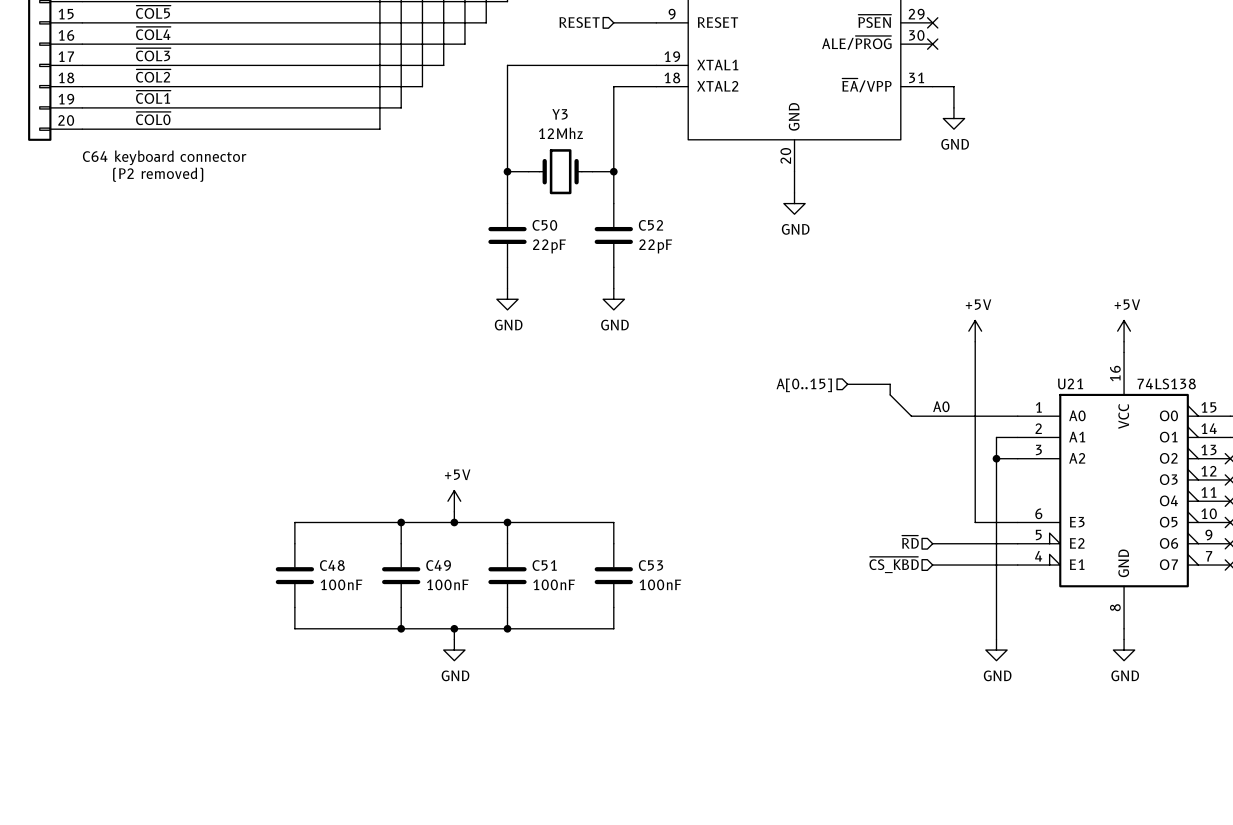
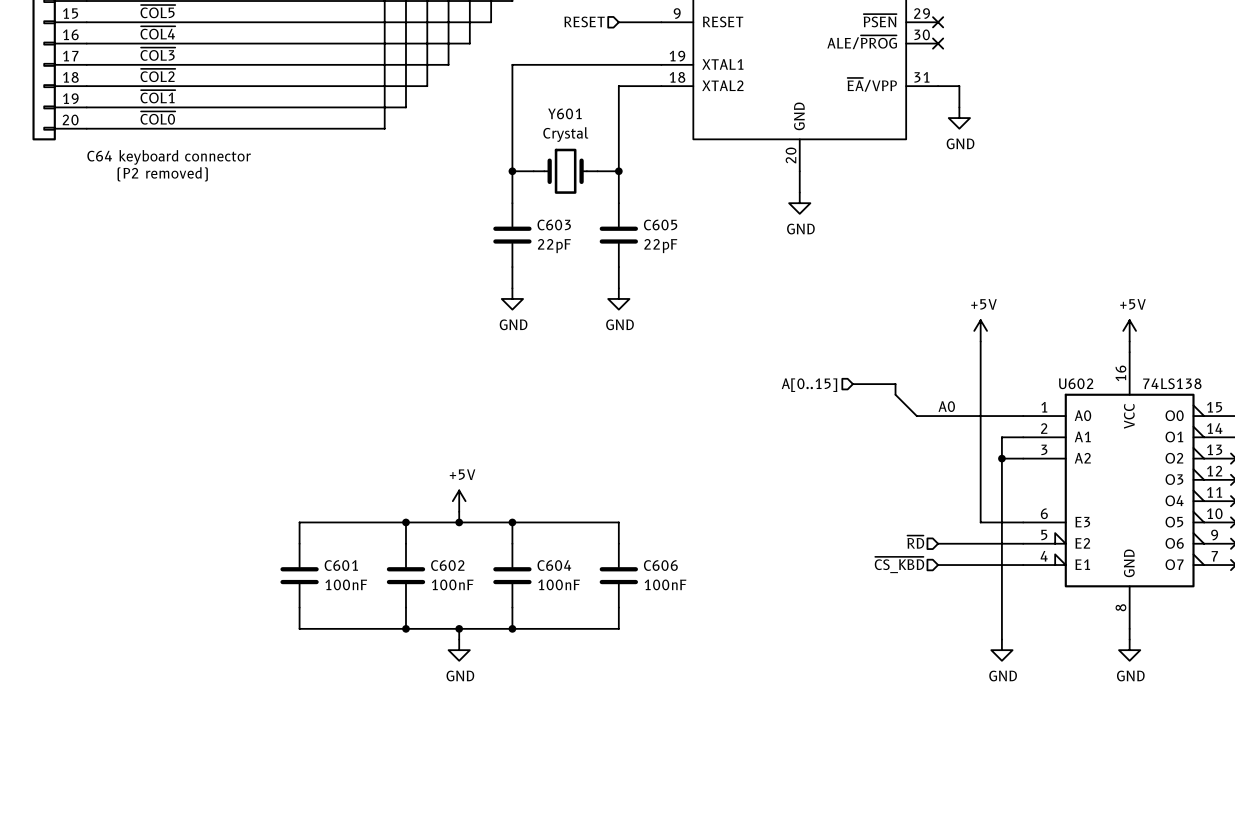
Y3 name: Y3 (560, 114) -> Y601 (564, 113)
Y3 value: 12Mhz (560, 133) -> Crystal (565, 134)
C50 name: C50 (544, 225) -> C603 (554, 225)
C52 name: C52 (650, 225) -> C605 (660, 225)
U21 name: U21 (1070, 383) -> U602 (1076, 383)
C48 name: C48 (332, 565) -> C601 (341, 565)
C49 name: C49 (438, 565) -> C602 (447, 565)
C51 name: C51 (544, 565) -> C604 (554, 565)
C53 name: C53 (651, 565) -> C606 (660, 565)

